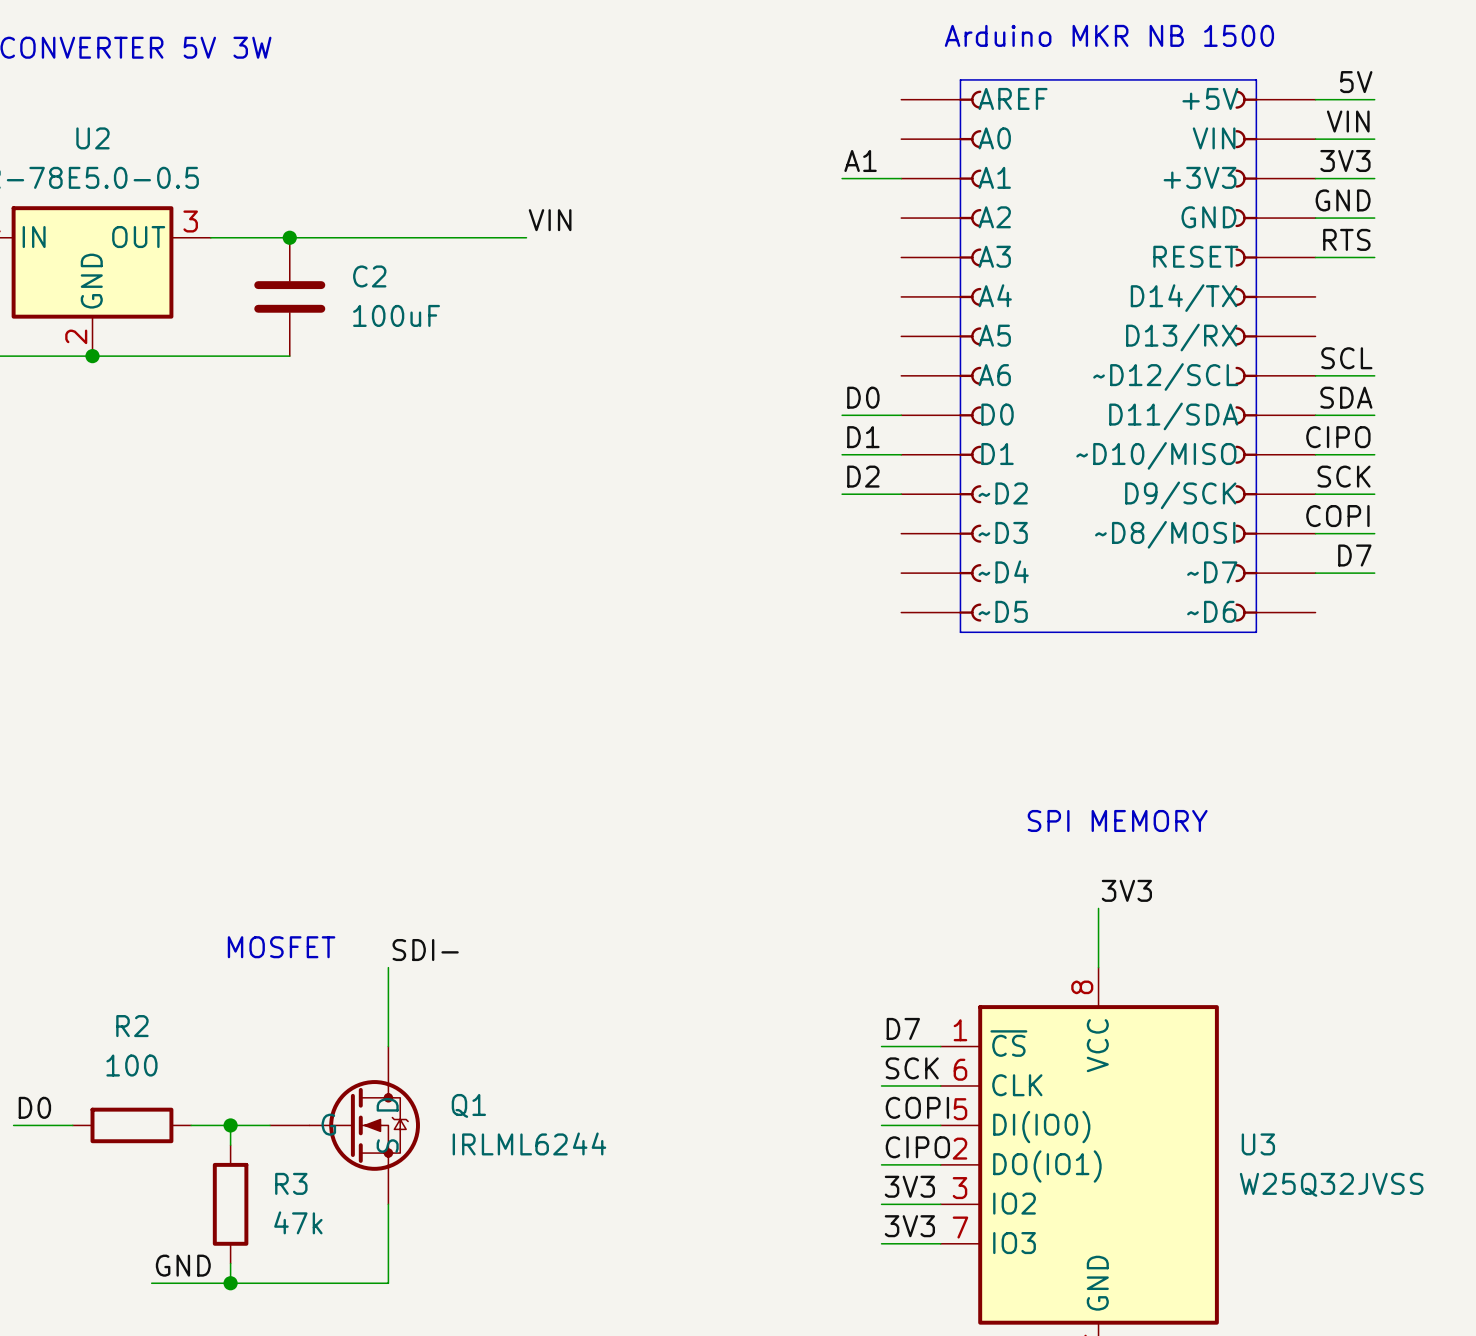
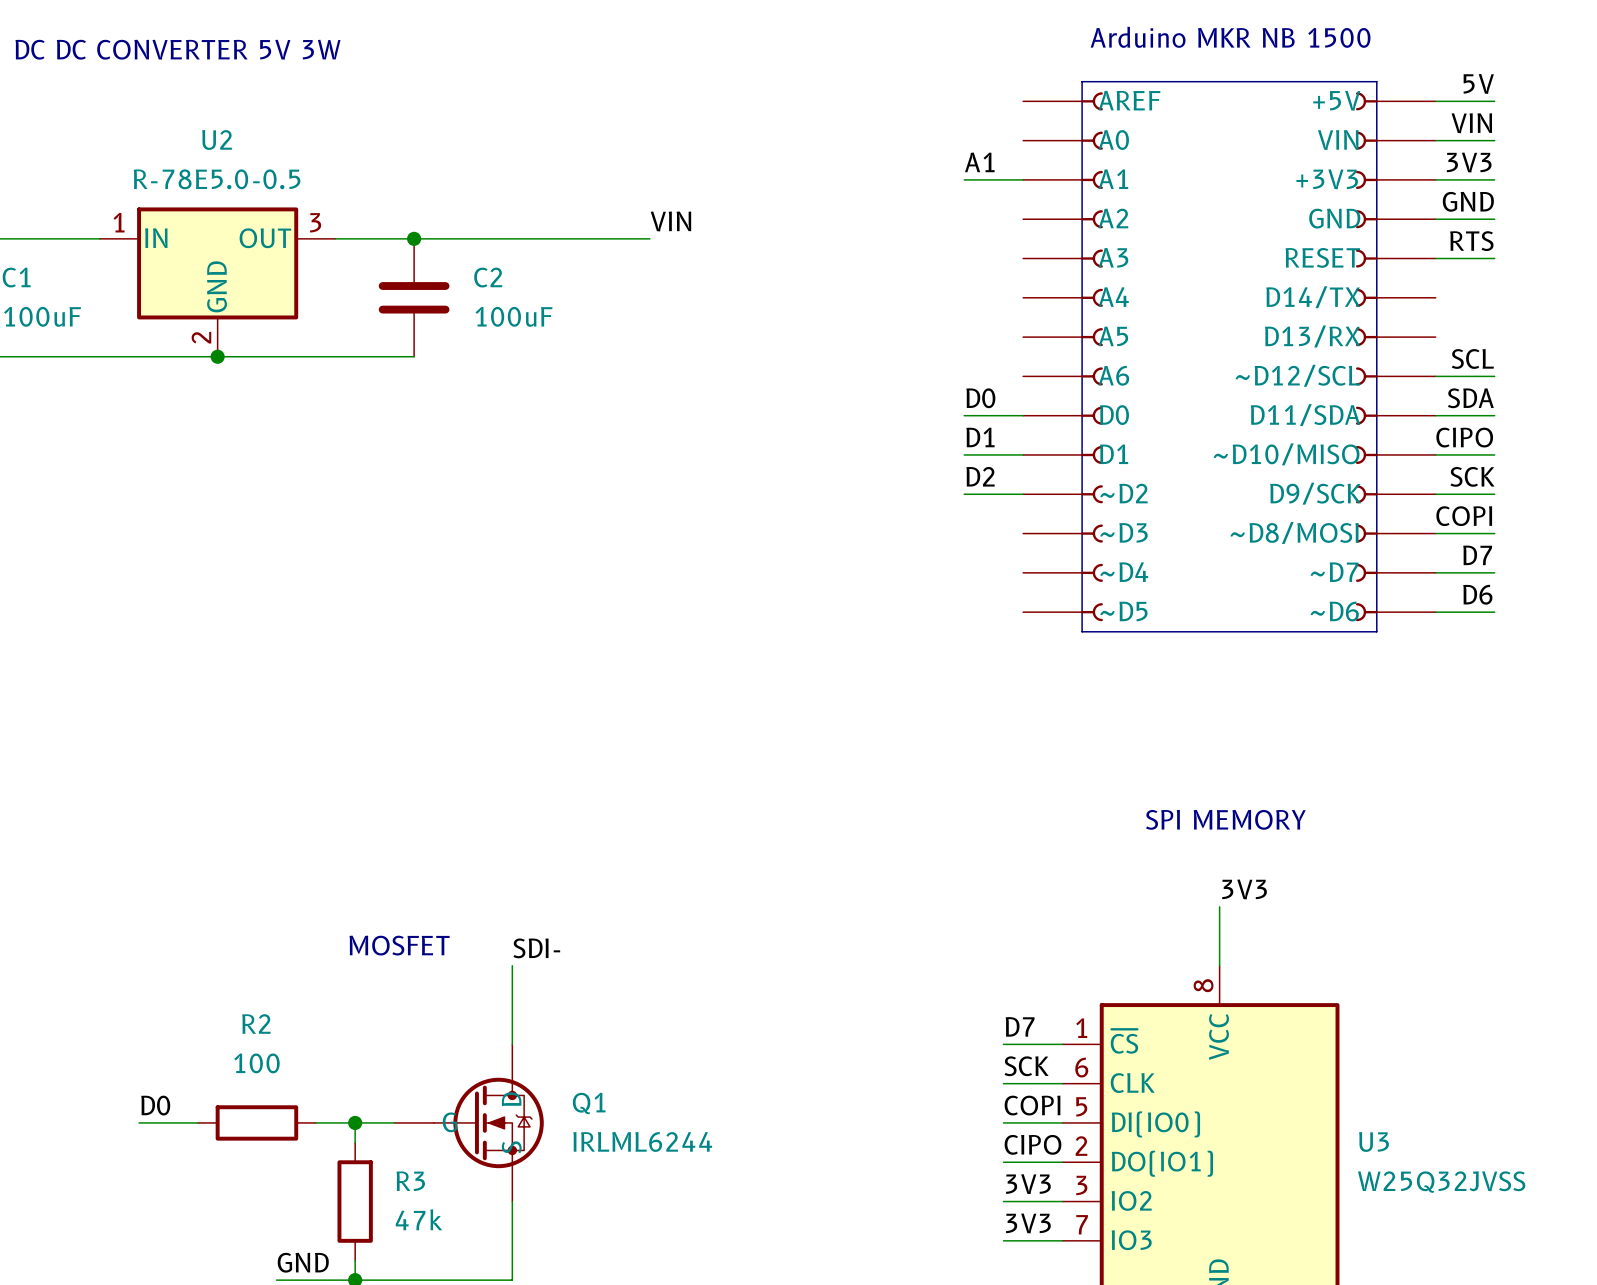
label: none -> D6 (1477, 594)
wire: none -> (1435, 612) (1494, 612)

